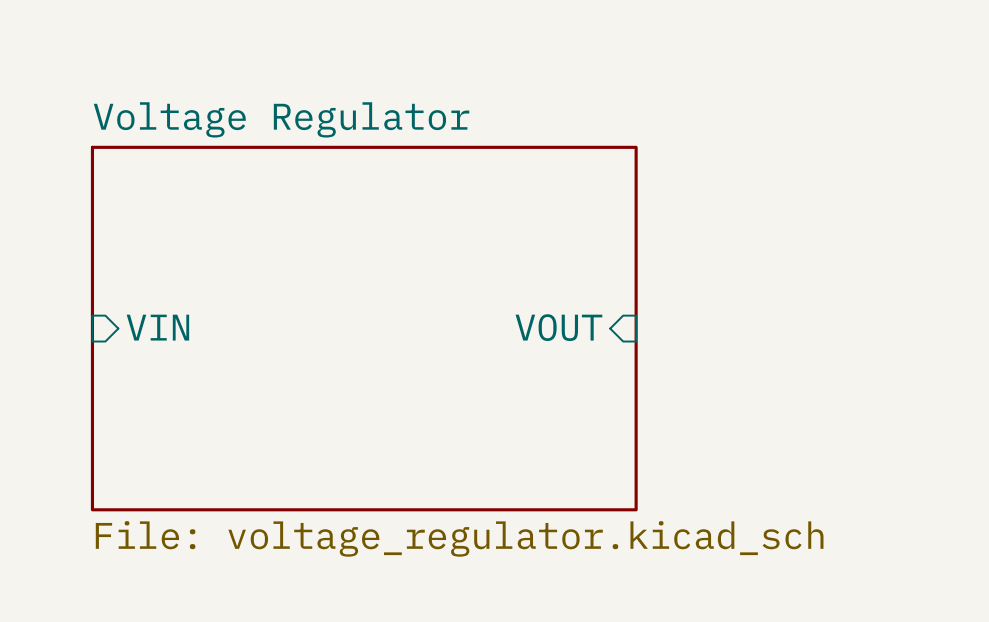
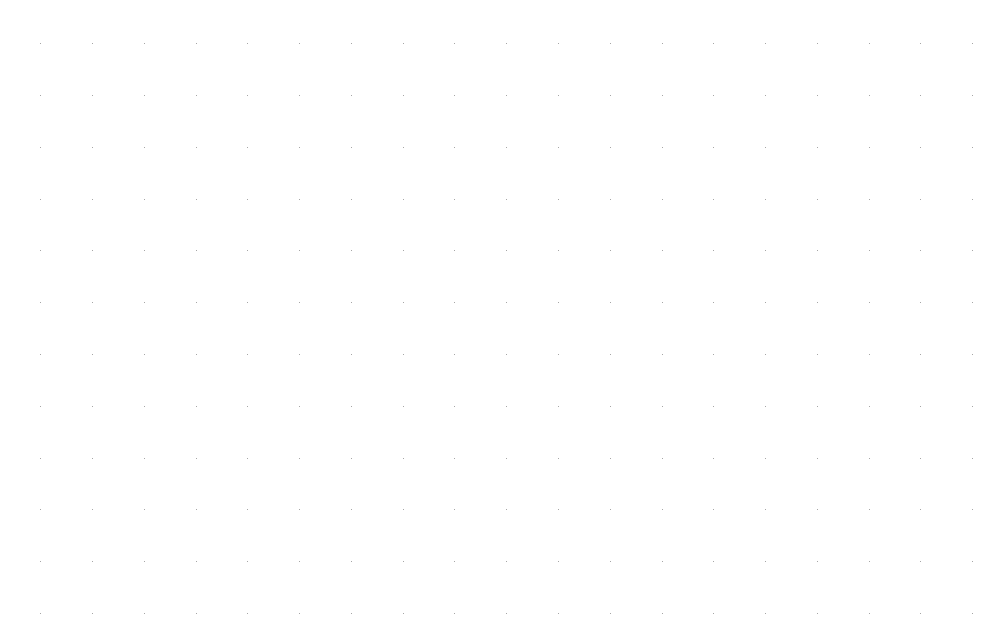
sheet pin: VIN (157, 327) -> none
sheet pin: VOUT (558, 327) -> none
sheet Voltage Regulator: File: voltage_regulator.kicad_sch (364, 328) -> none

